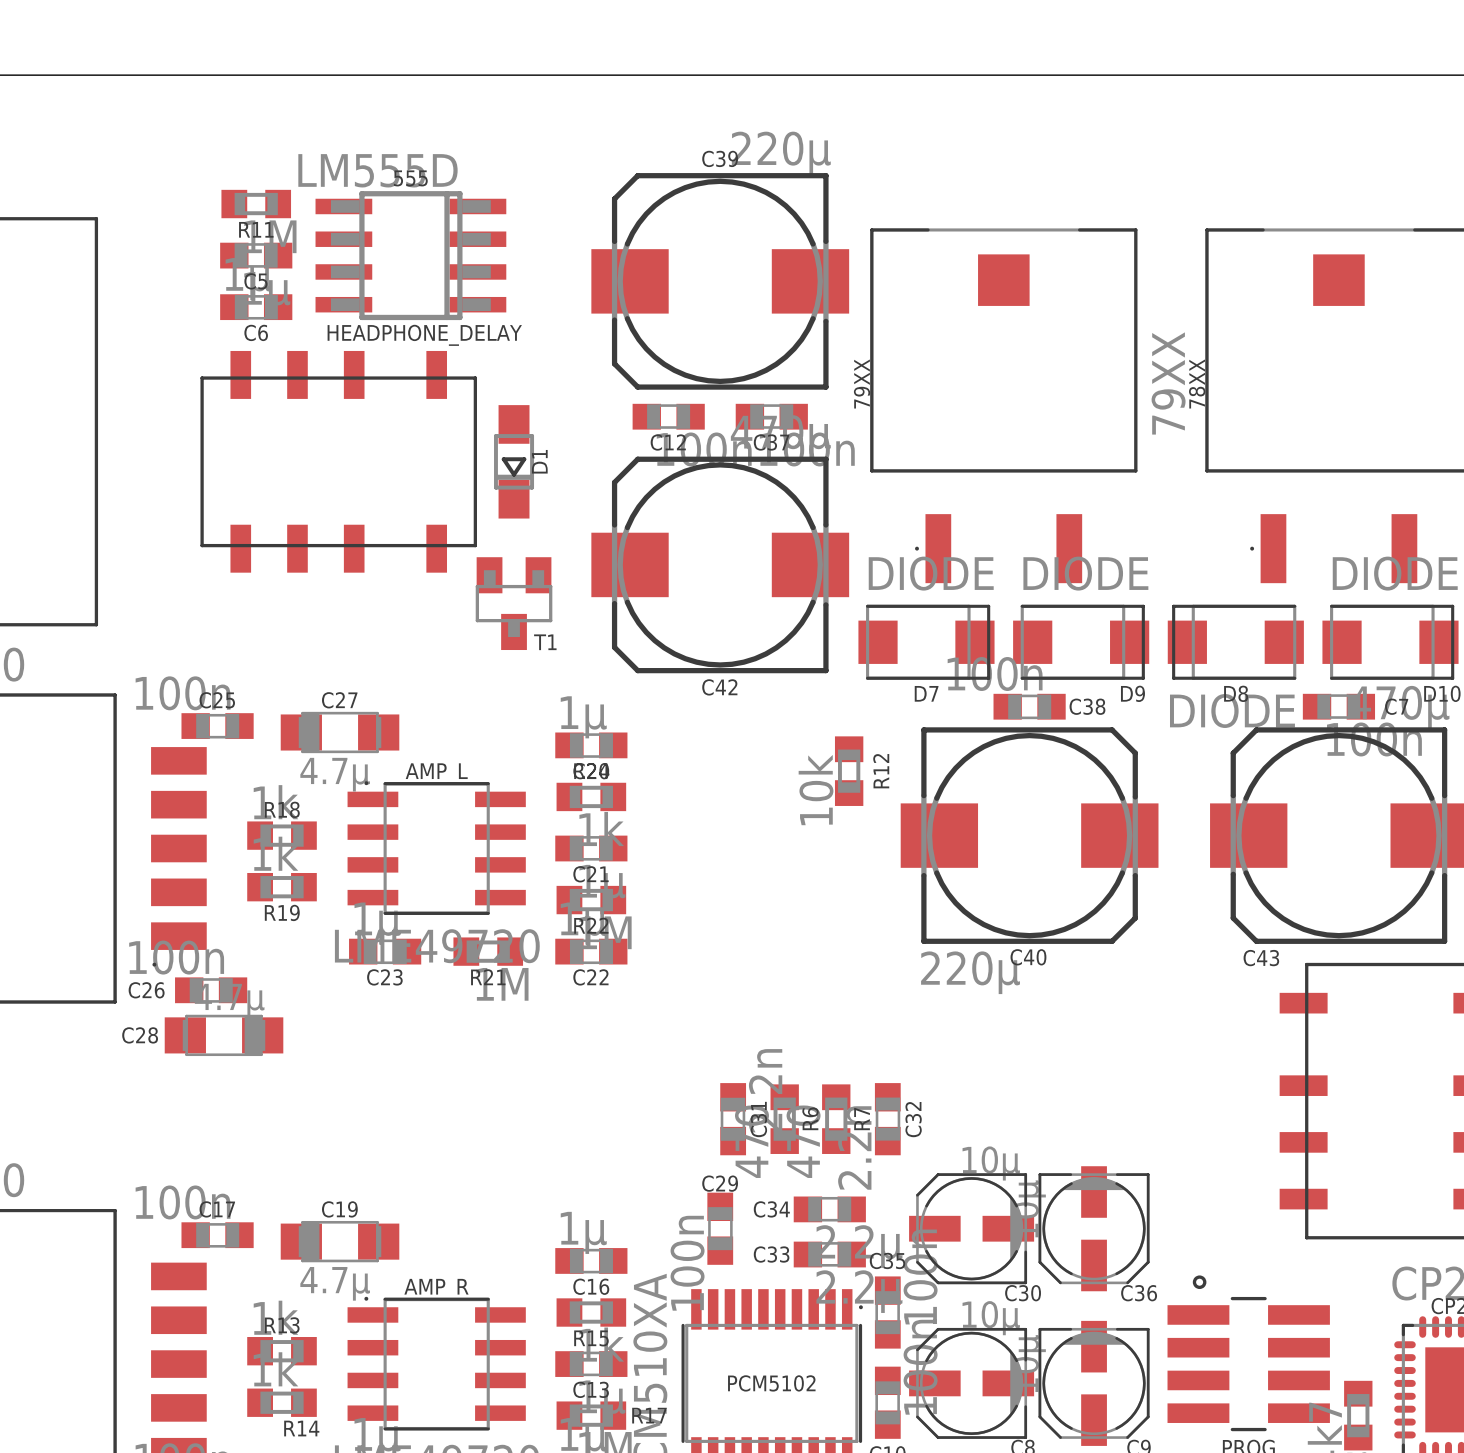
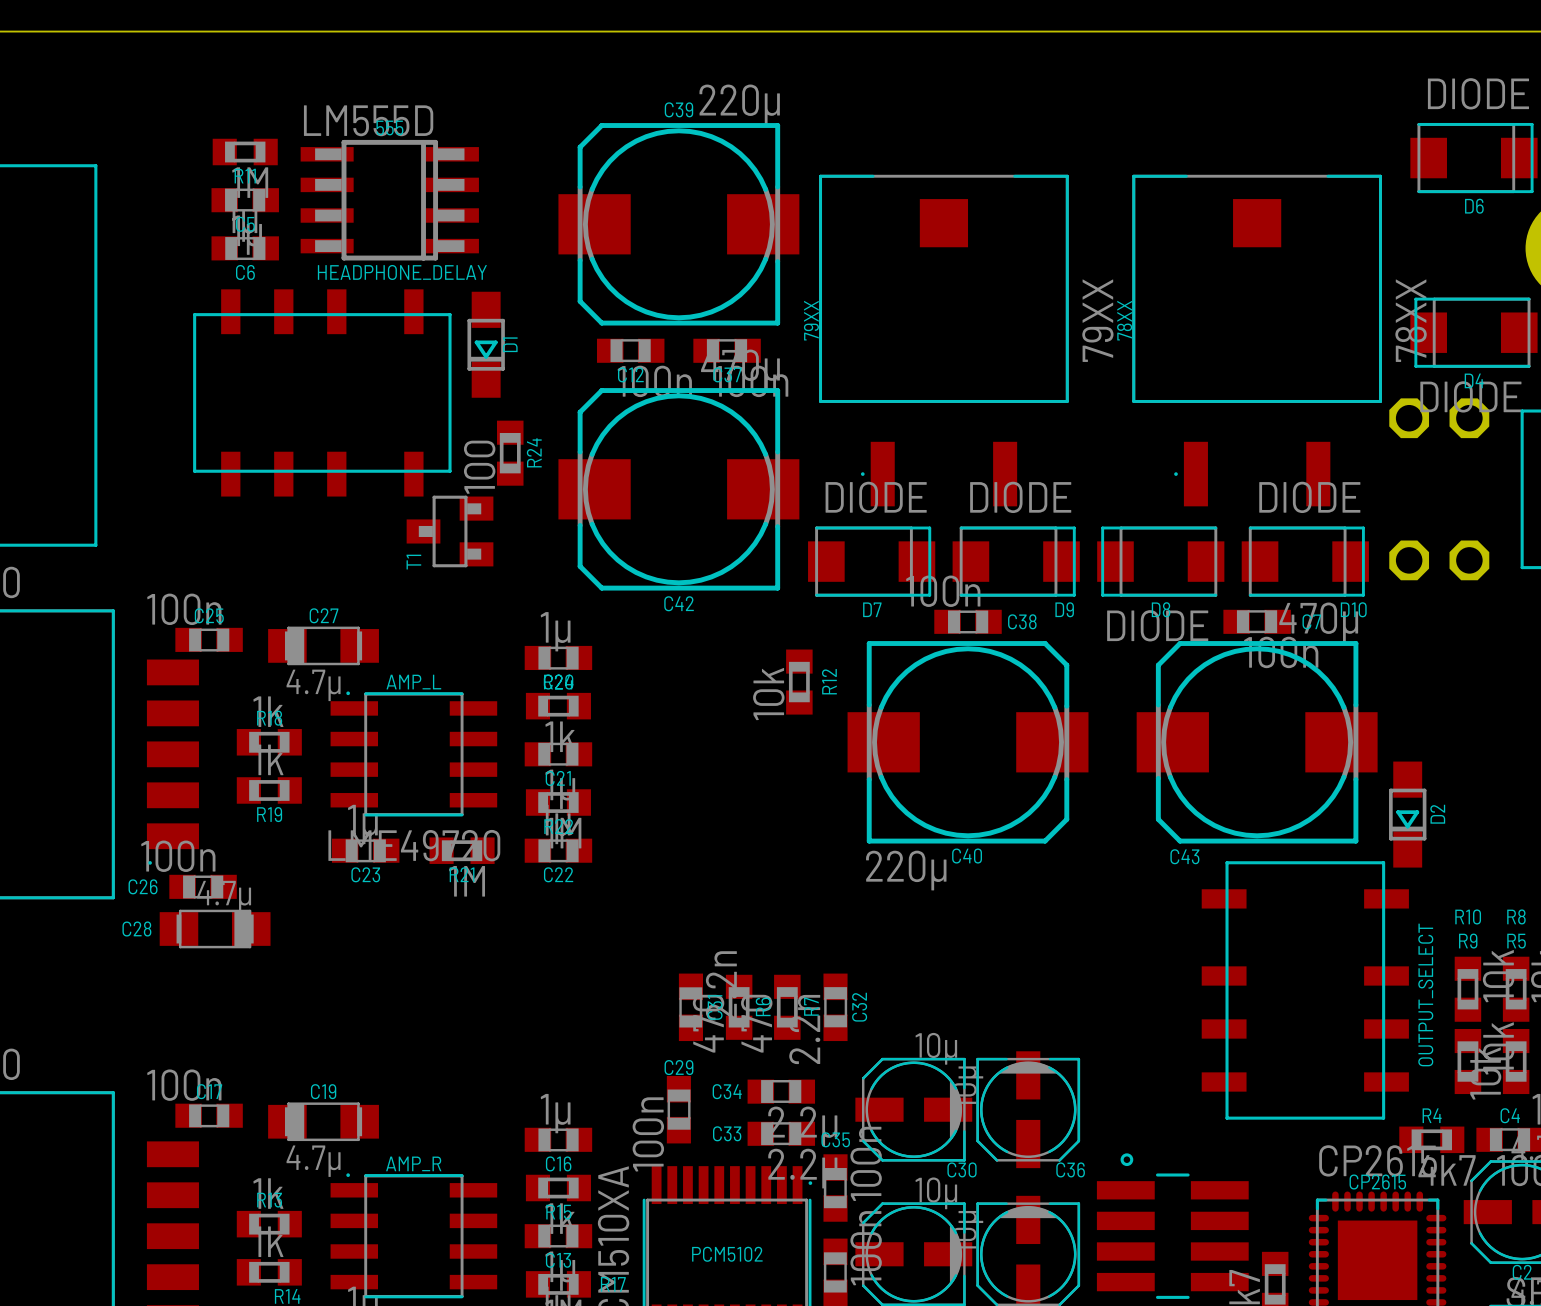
D1 position: (514, 461) -> (486, 344)
R24: none -> 100 (510, 453)
T1 rotation: 0° (514, 603) -> 90° clockwise (450, 531)

